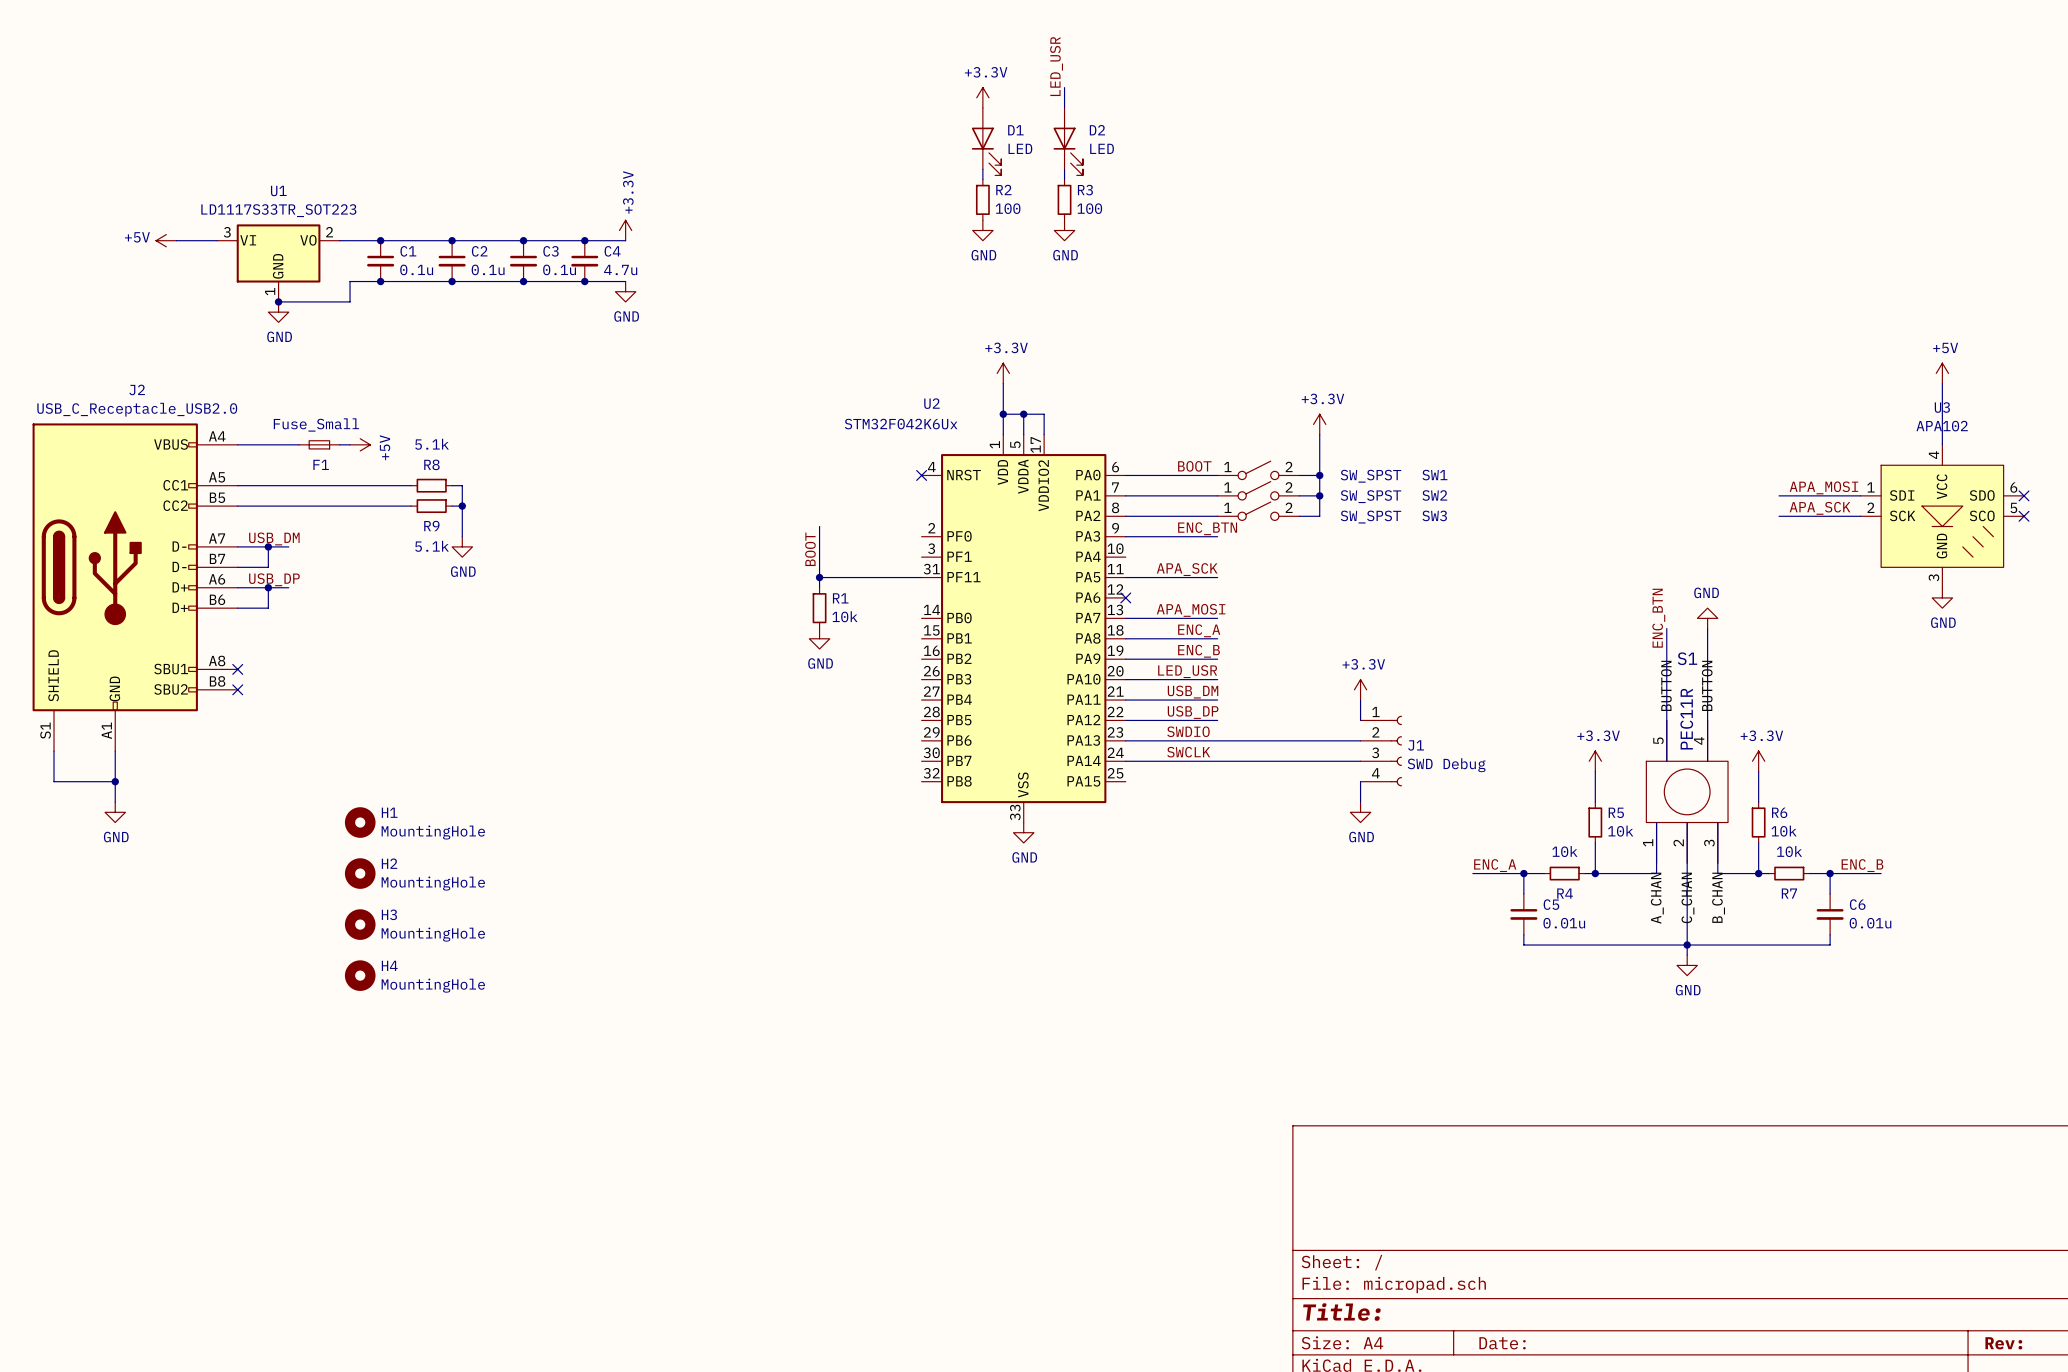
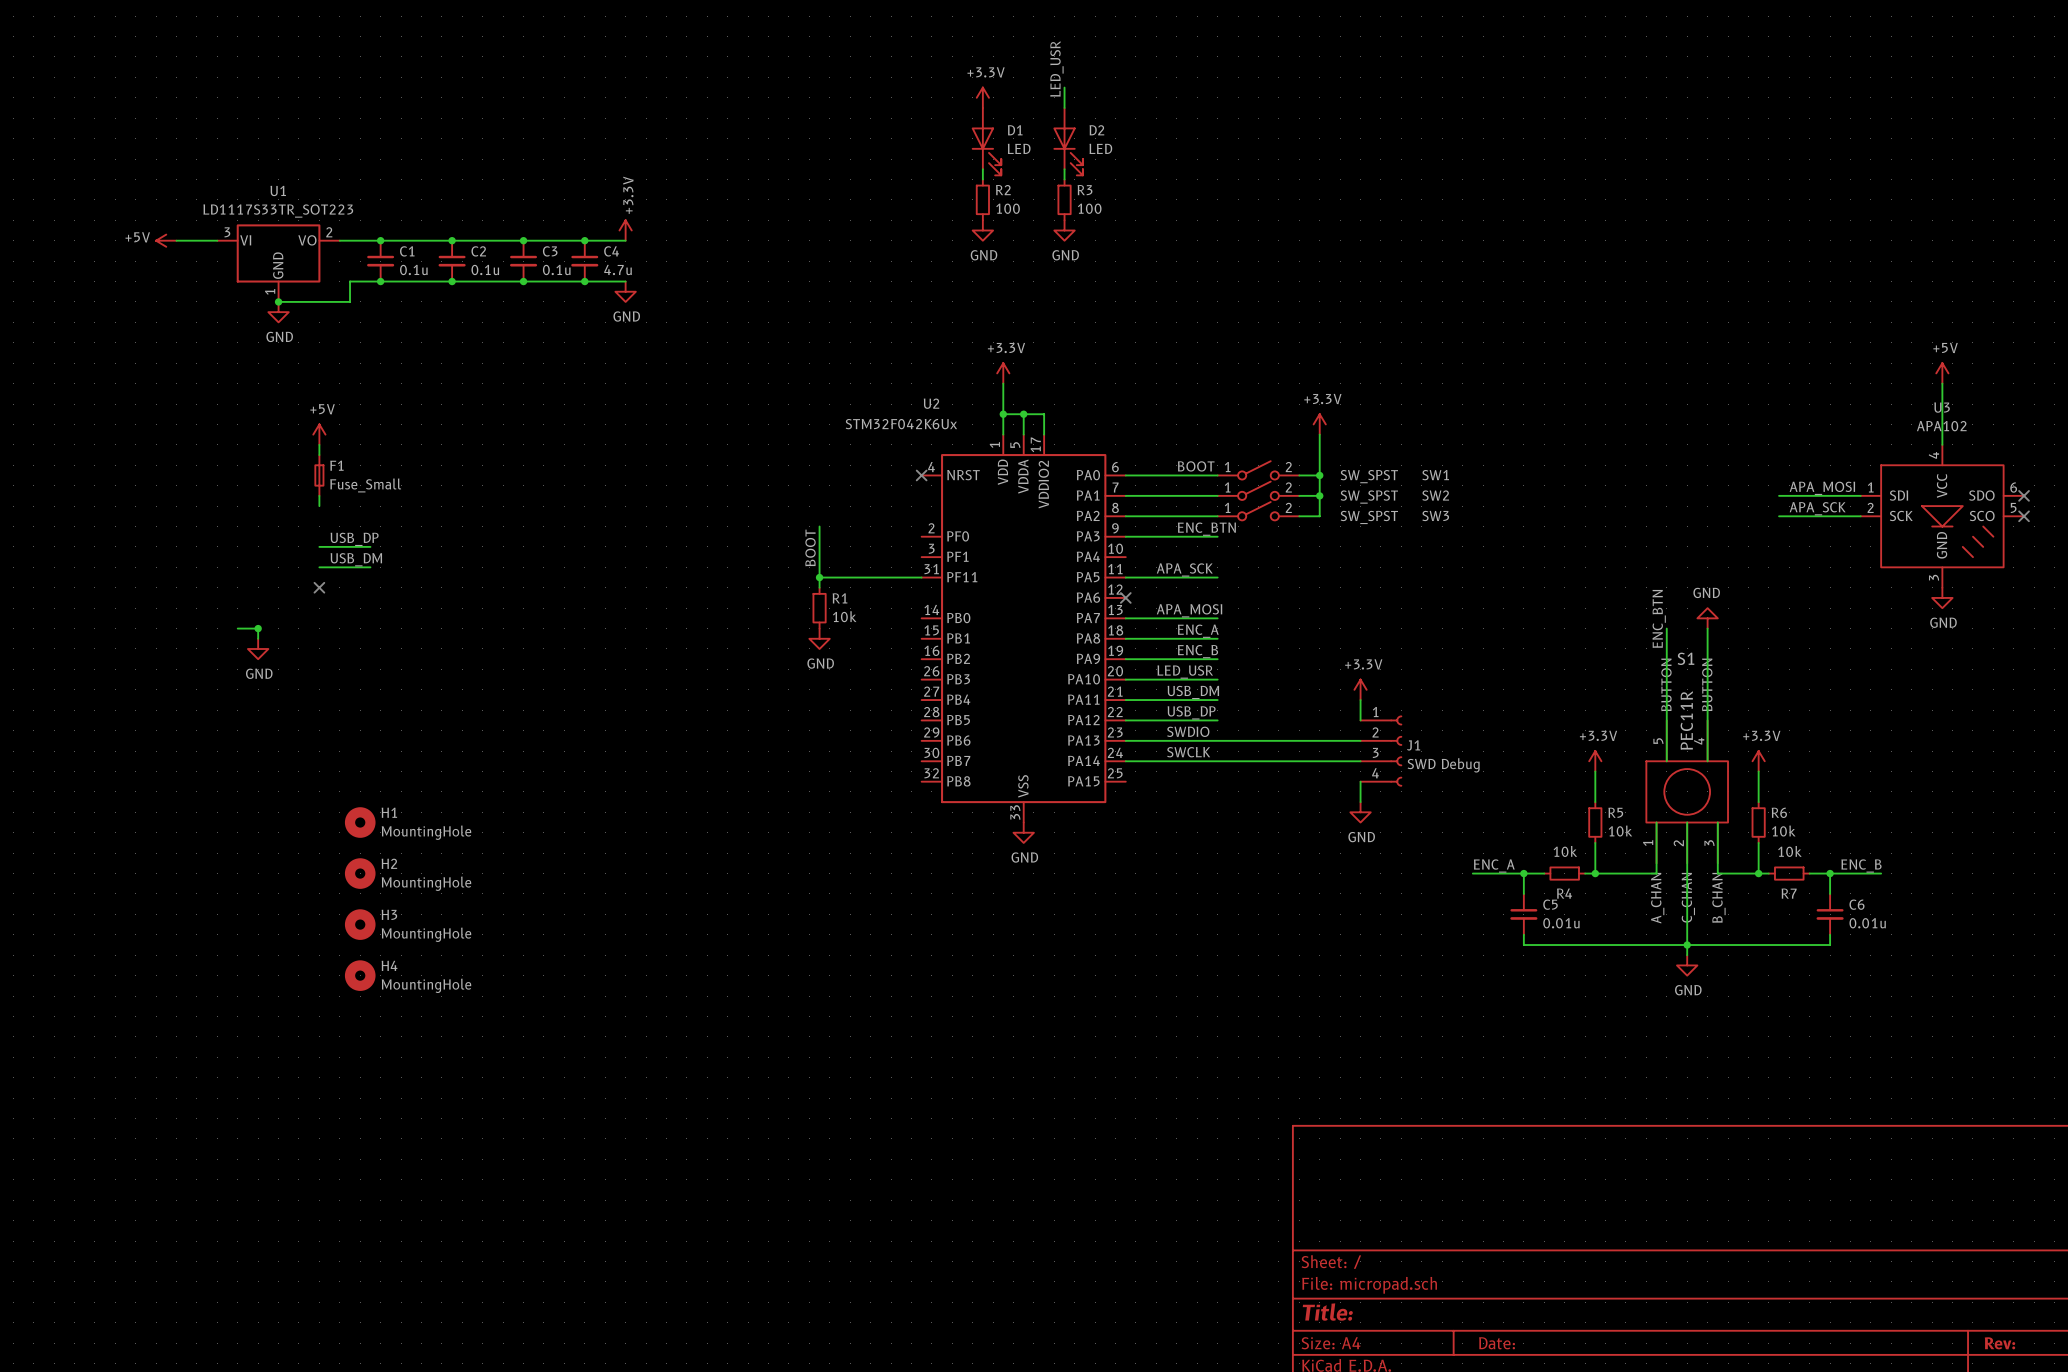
F1 value position: Fuse_Small (316, 424) -> Fuse_Small (365, 485)
wire: (237, 444) (298, 444) -> none
wire: none -> (319, 444) (319, 455)
F1 rotation: 0° (319, 444) -> 90° clockwise (319, 475)
F1 position: (319, 444) -> (319, 475)
wire: (339, 444) (350, 444) -> none
power symbol rotation: 0° (360, 444) -> 90° counterclockwise (319, 434)
power symbol position: +5V (360, 444) -> +5V (319, 434)
F1 name position: F1 (321, 464) -> F1 (336, 465)
wire: (237, 485) (411, 485) -> none
R8: 5.1k (431, 485) -> none
wire: (452, 485) (462, 485) (462, 536) -> none
wire: none -> (319, 495) (319, 506)
wire: (237, 506) (411, 506) -> none
R9: 5.1k (431, 506) -> none
wire: (452, 506) (462, 506) -> none
junction: (462, 506) -> none
label position: USB_DM (274, 538) -> USB_DM (356, 559)
wire: (237, 546) (288, 546) -> (319, 546) (370, 546)
wire: (268, 546) (268, 567) (237, 567) -> none
junction: (268, 546) -> none
power symbol: GND (462, 546) -> none
label position: USB_DP (274, 579) -> USB_DP (354, 539)
J2: USB_C_Receptacle_USB2.0 (135, 587) -> none
wire: (237, 587) (288, 587) -> (319, 567) (370, 567)
wire: (268, 587) (268, 608) (237, 608) -> none
junction: (268, 587) -> none
no-connect mark: none -> (319, 587)
wire: none -> (237, 628) (258, 628) (258, 638)
junction: none -> (258, 628)
power symbol: none -> GND (258, 648)
no-connect mark: (237, 669) -> none
no-connect mark: (237, 689) -> none
wire: (54, 751) (54, 781) (115, 781) -> none
wire: (115, 751) (115, 802) -> none
junction: (115, 781) -> none
power symbol: GND (115, 812) -> none

